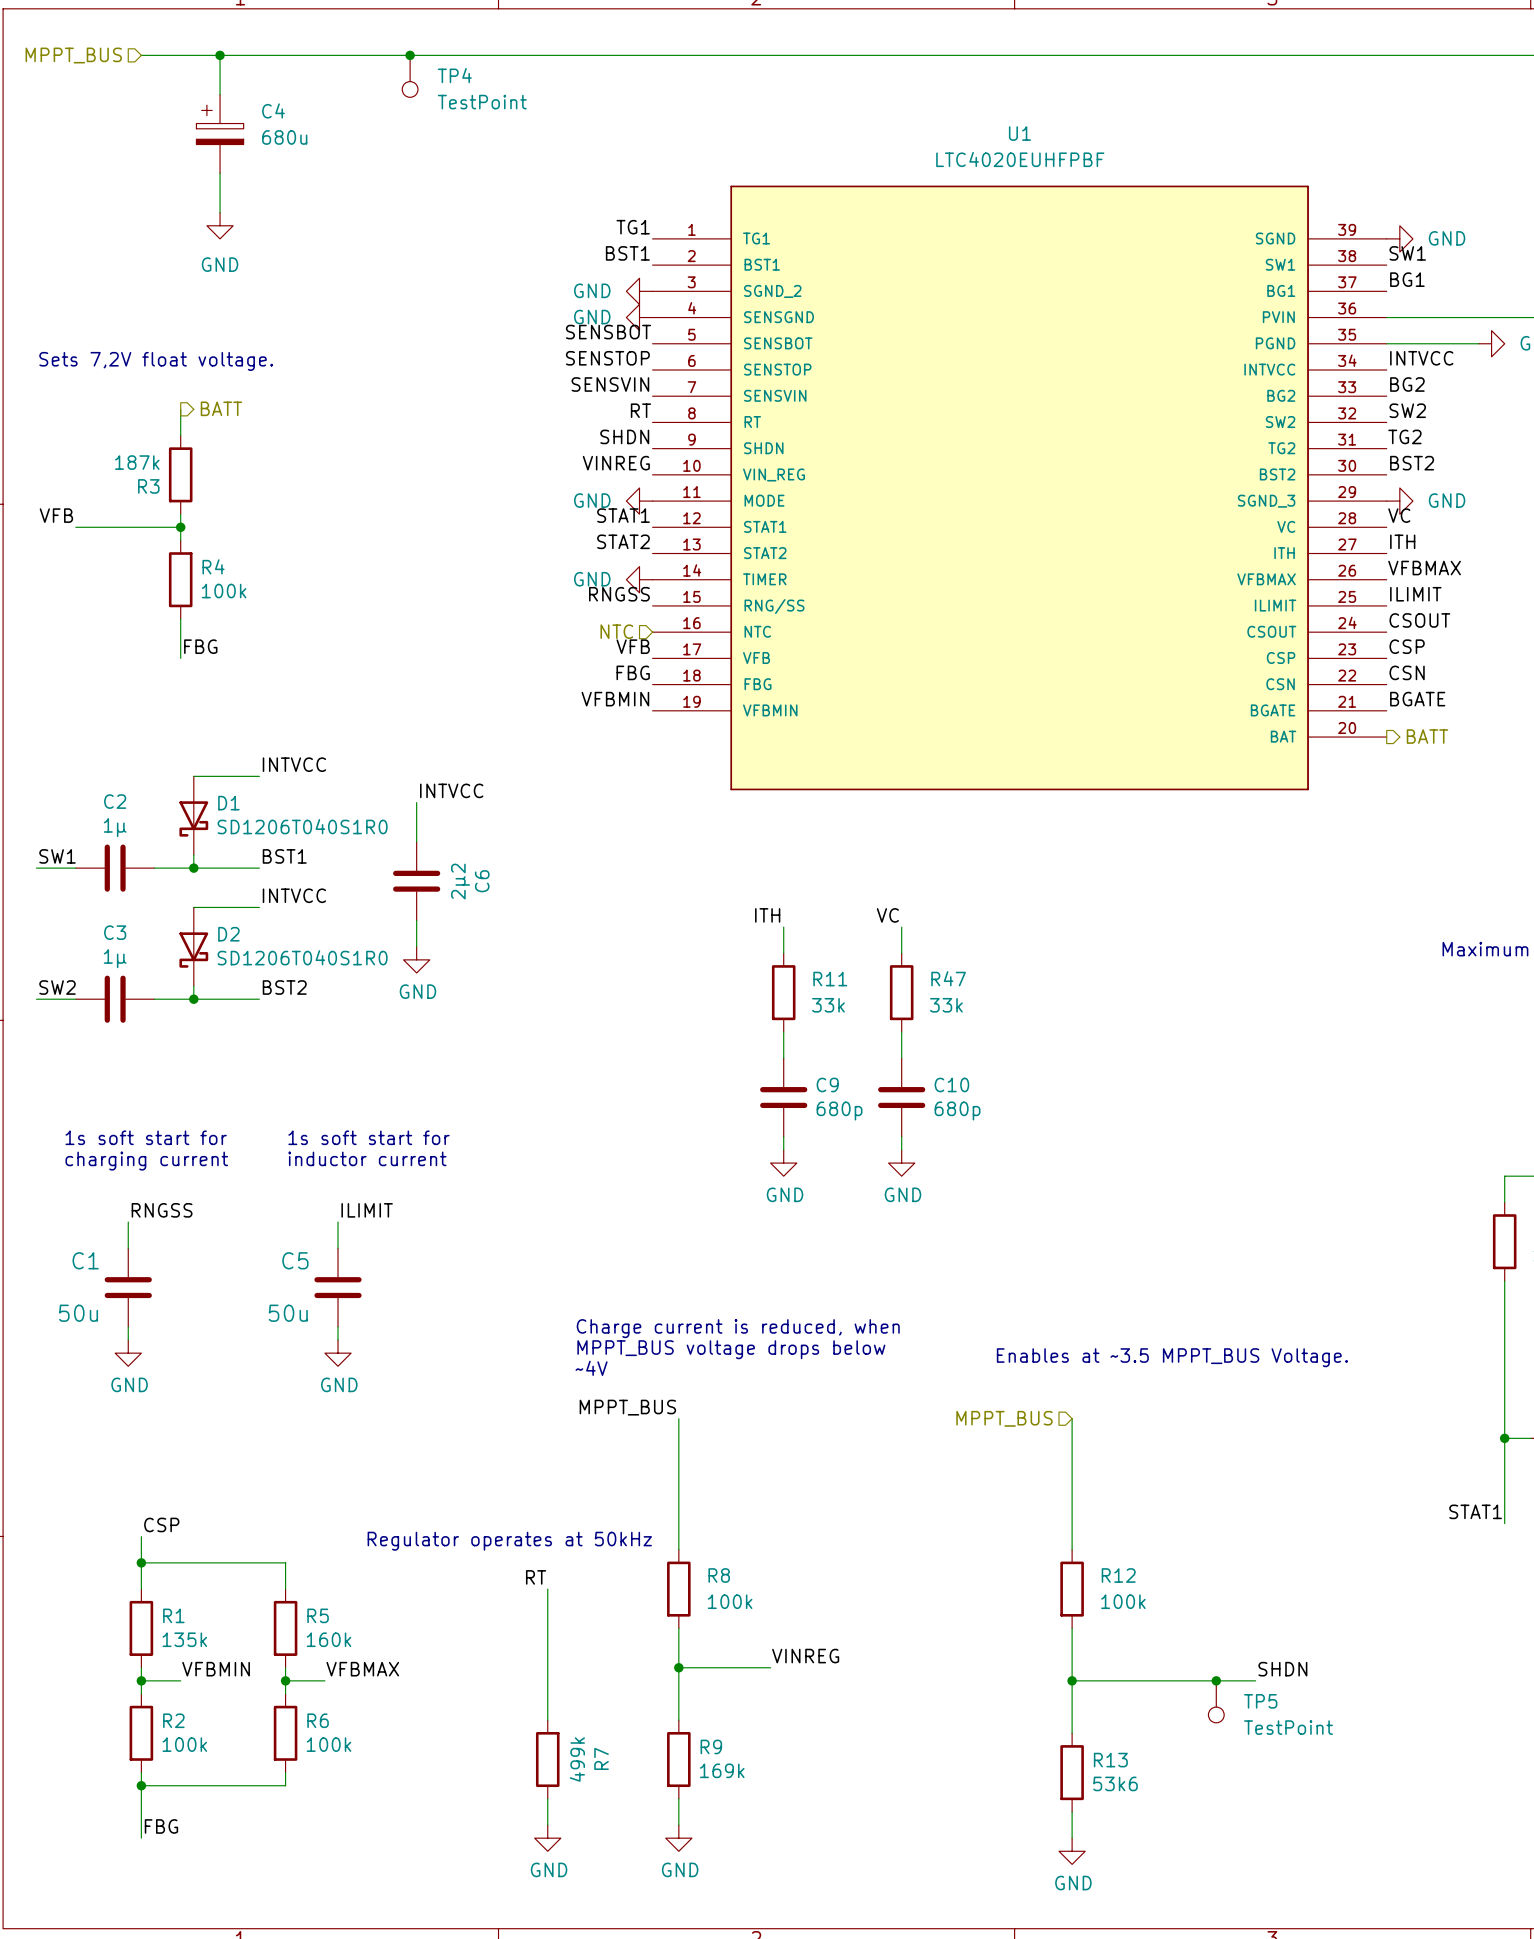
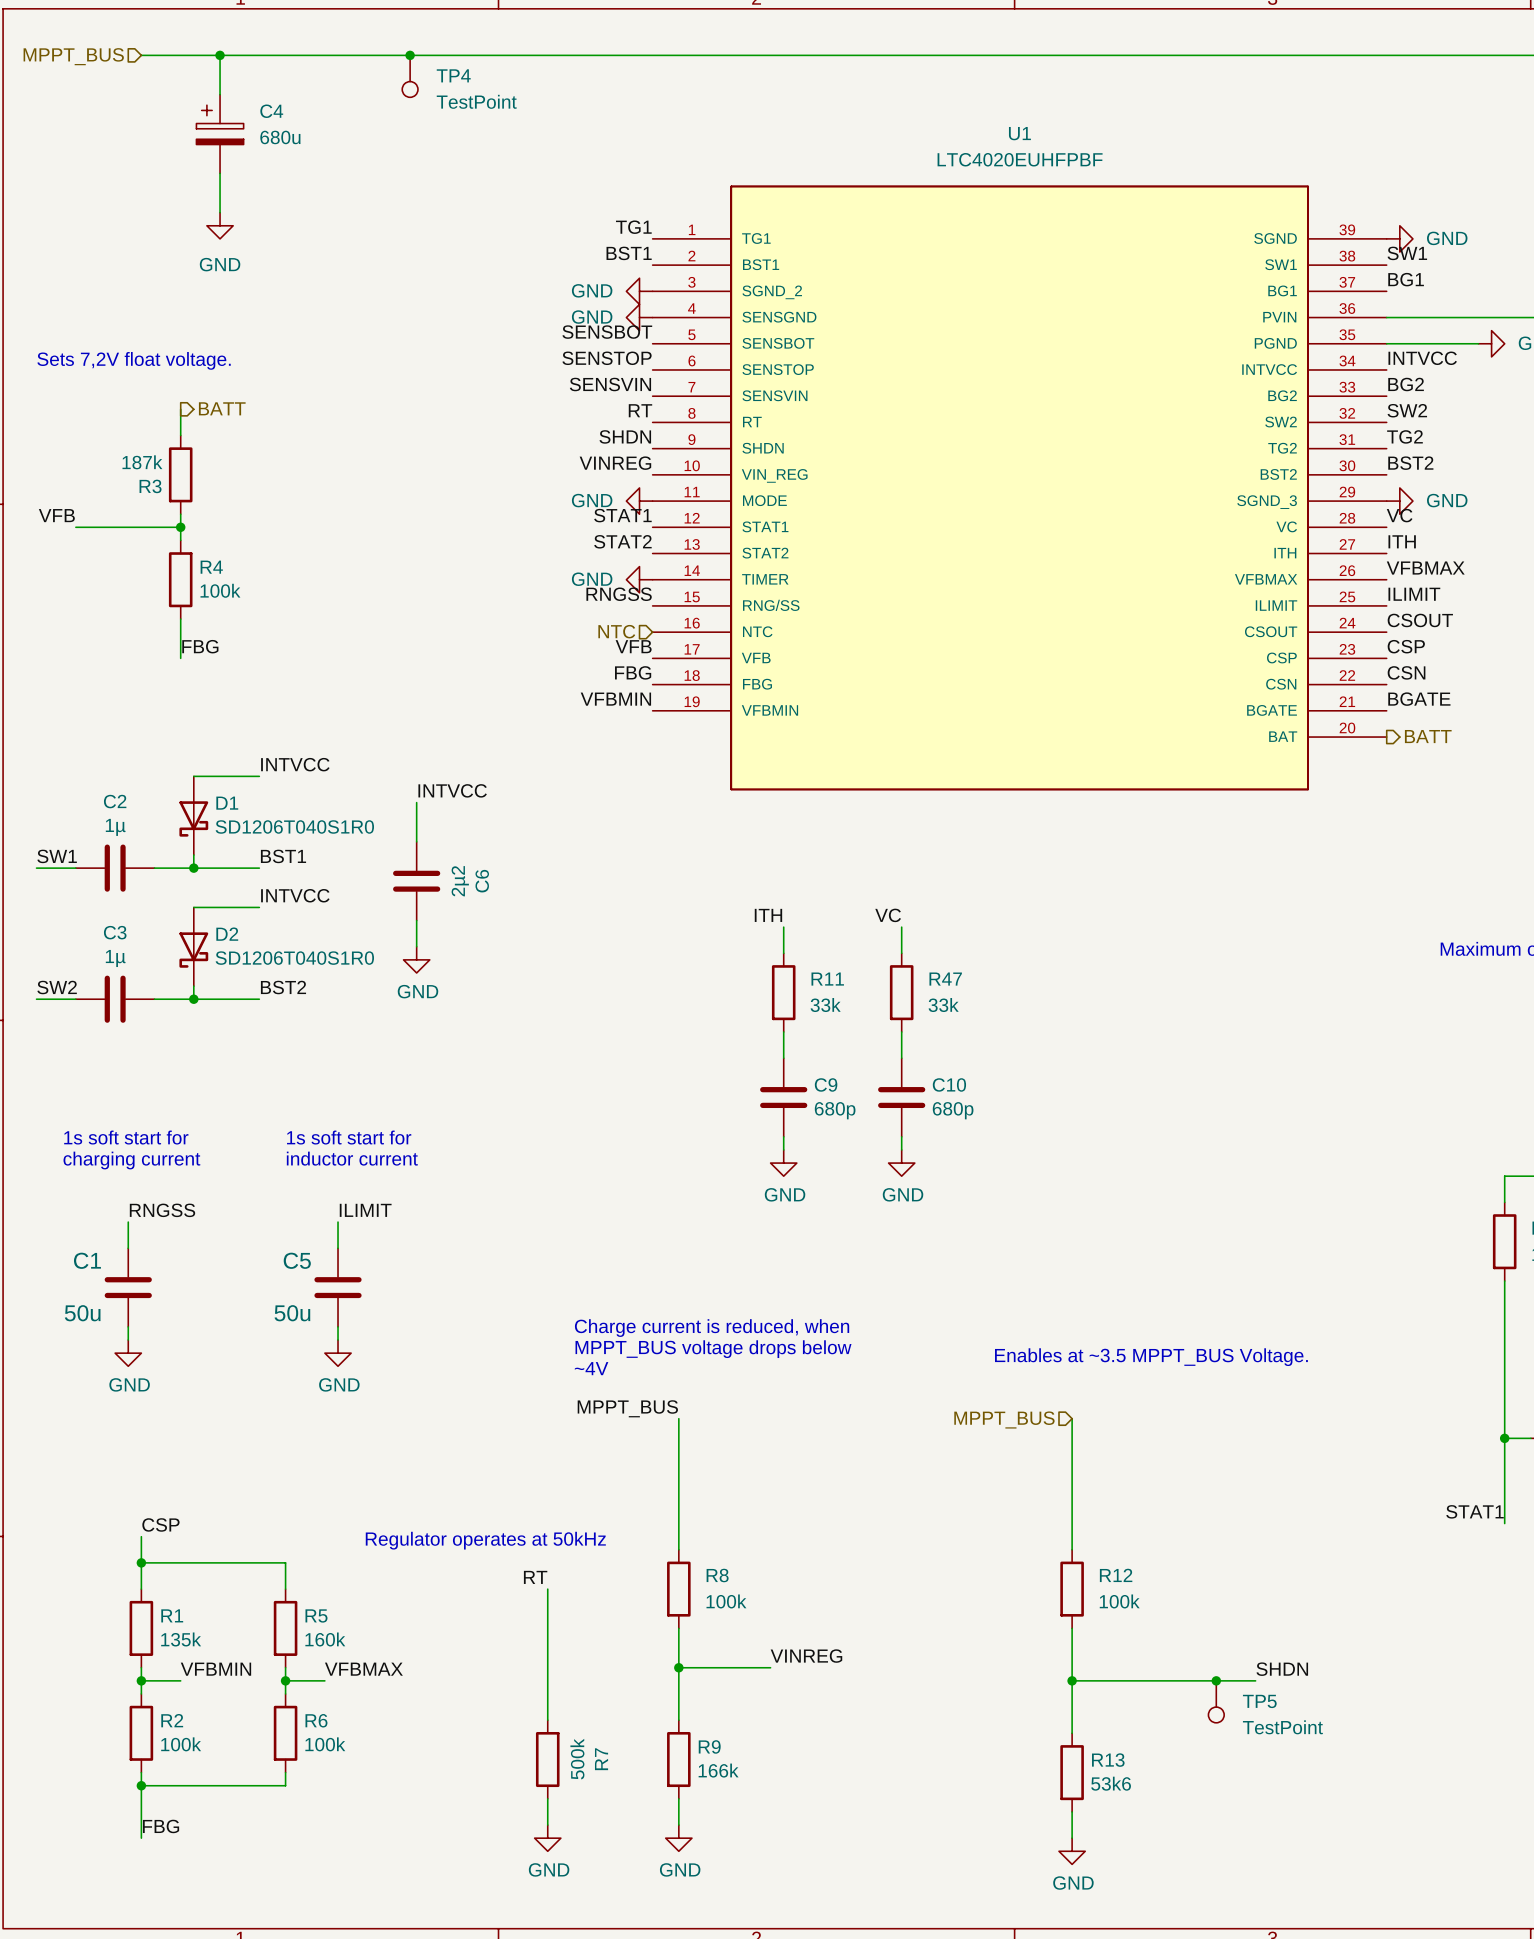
R7 value: 499k (577, 1759) -> 500k (577, 1759)
R9 value: 169k (722, 1770) -> 166k (718, 1770)

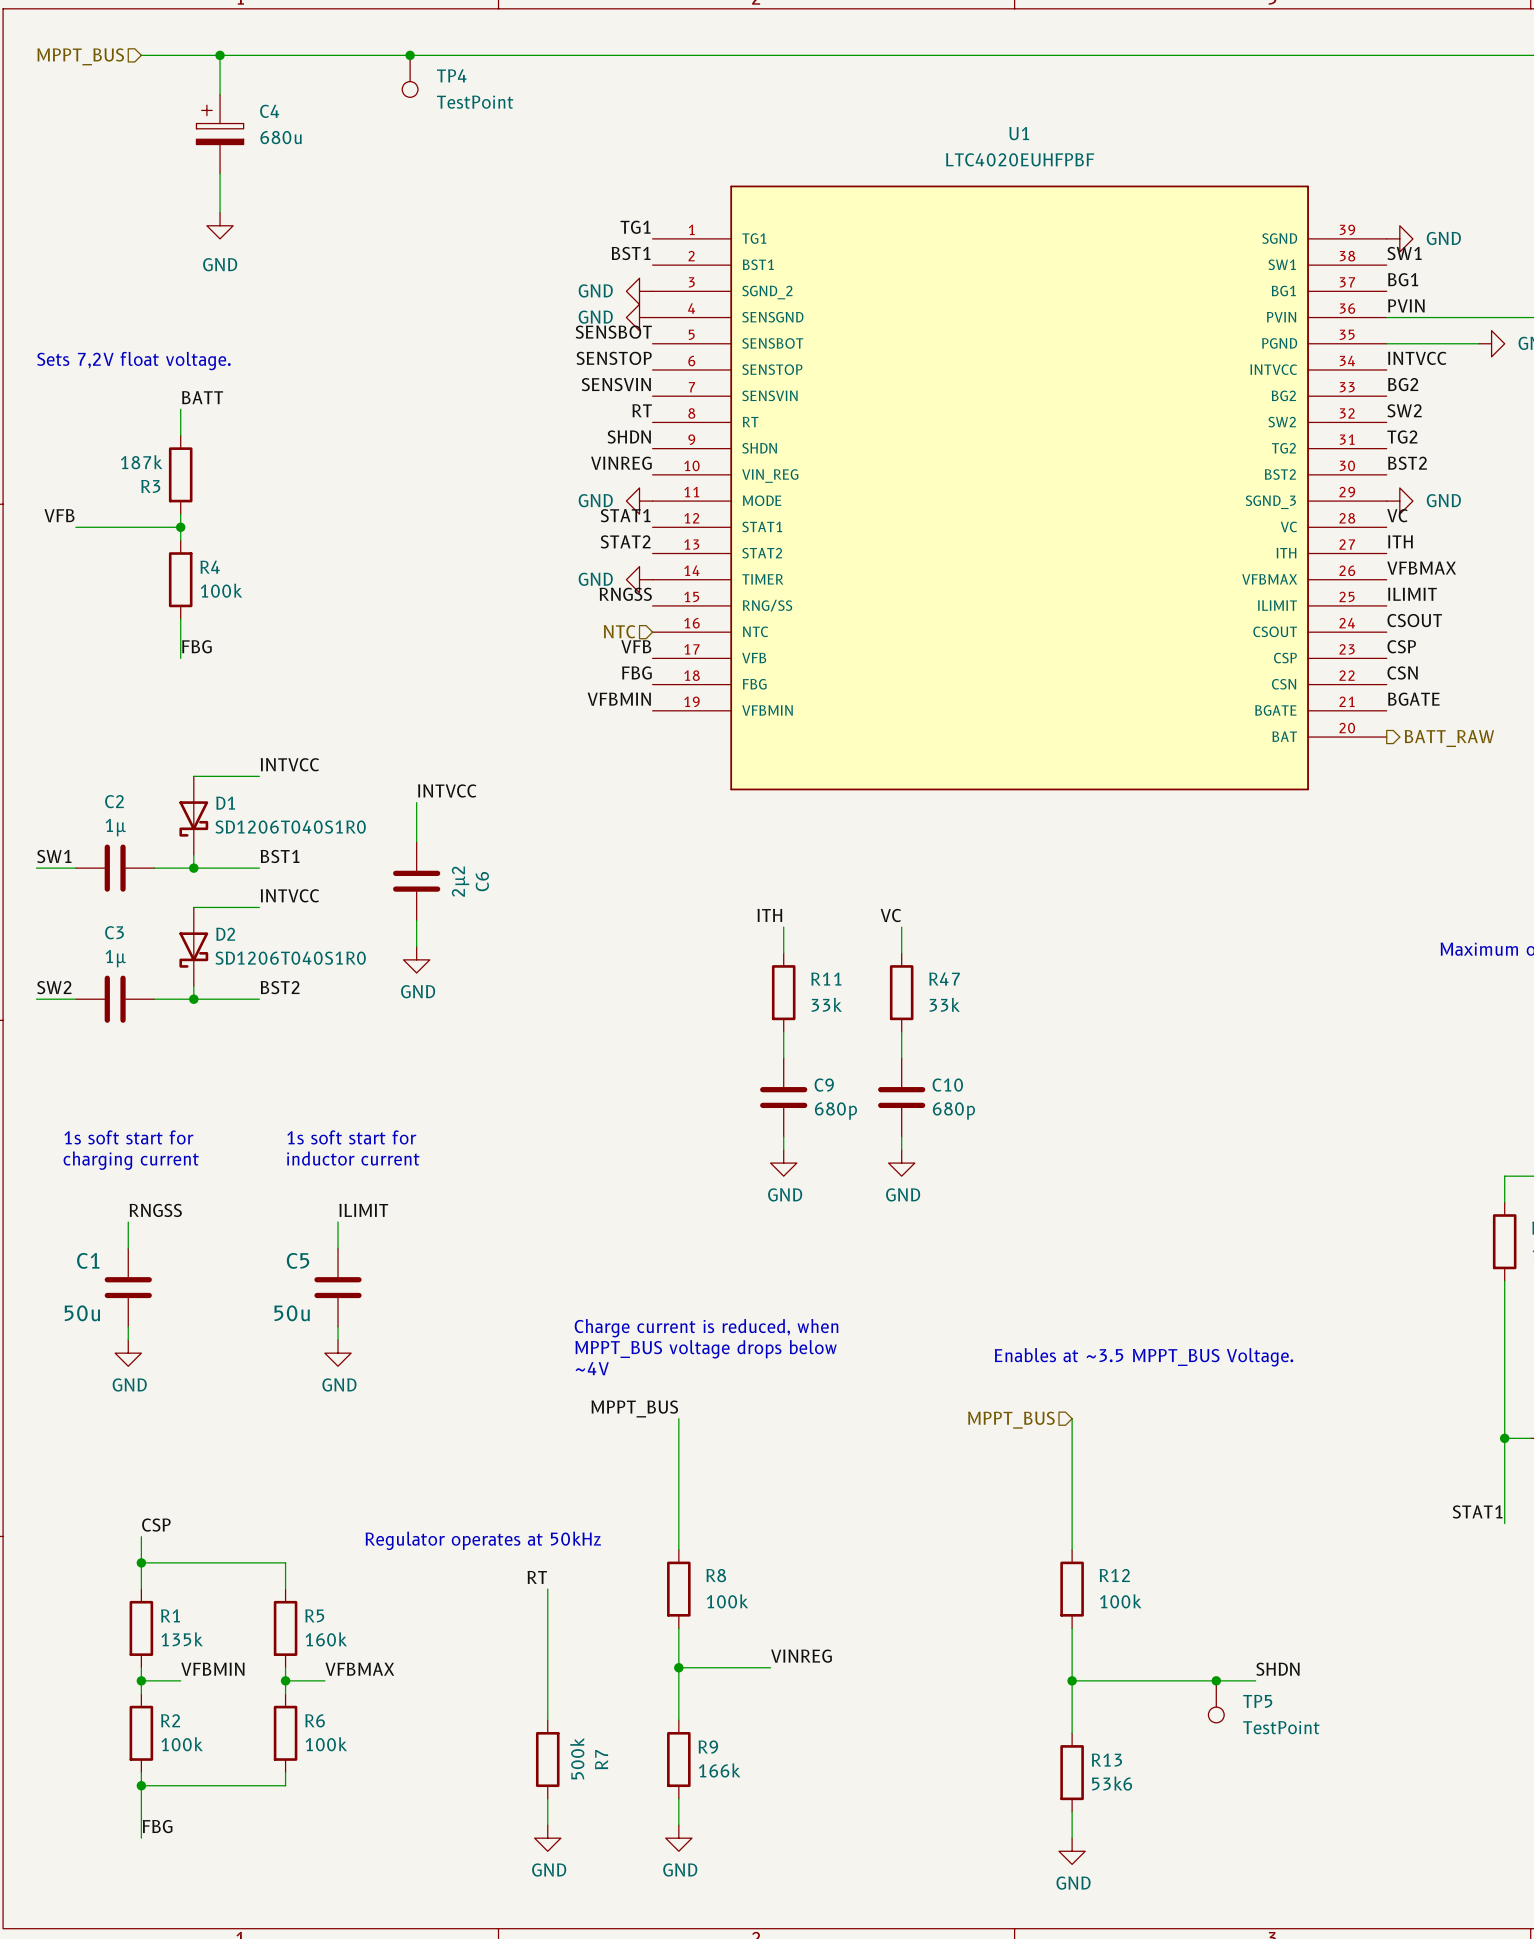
label: none -> PVIN (1406, 305)
label: none -> BATT (202, 397)
hierarchical label: BATT (222, 408) -> none
hierarchical label: BATT (1428, 736) -> BATT_RAW (1449, 738)

